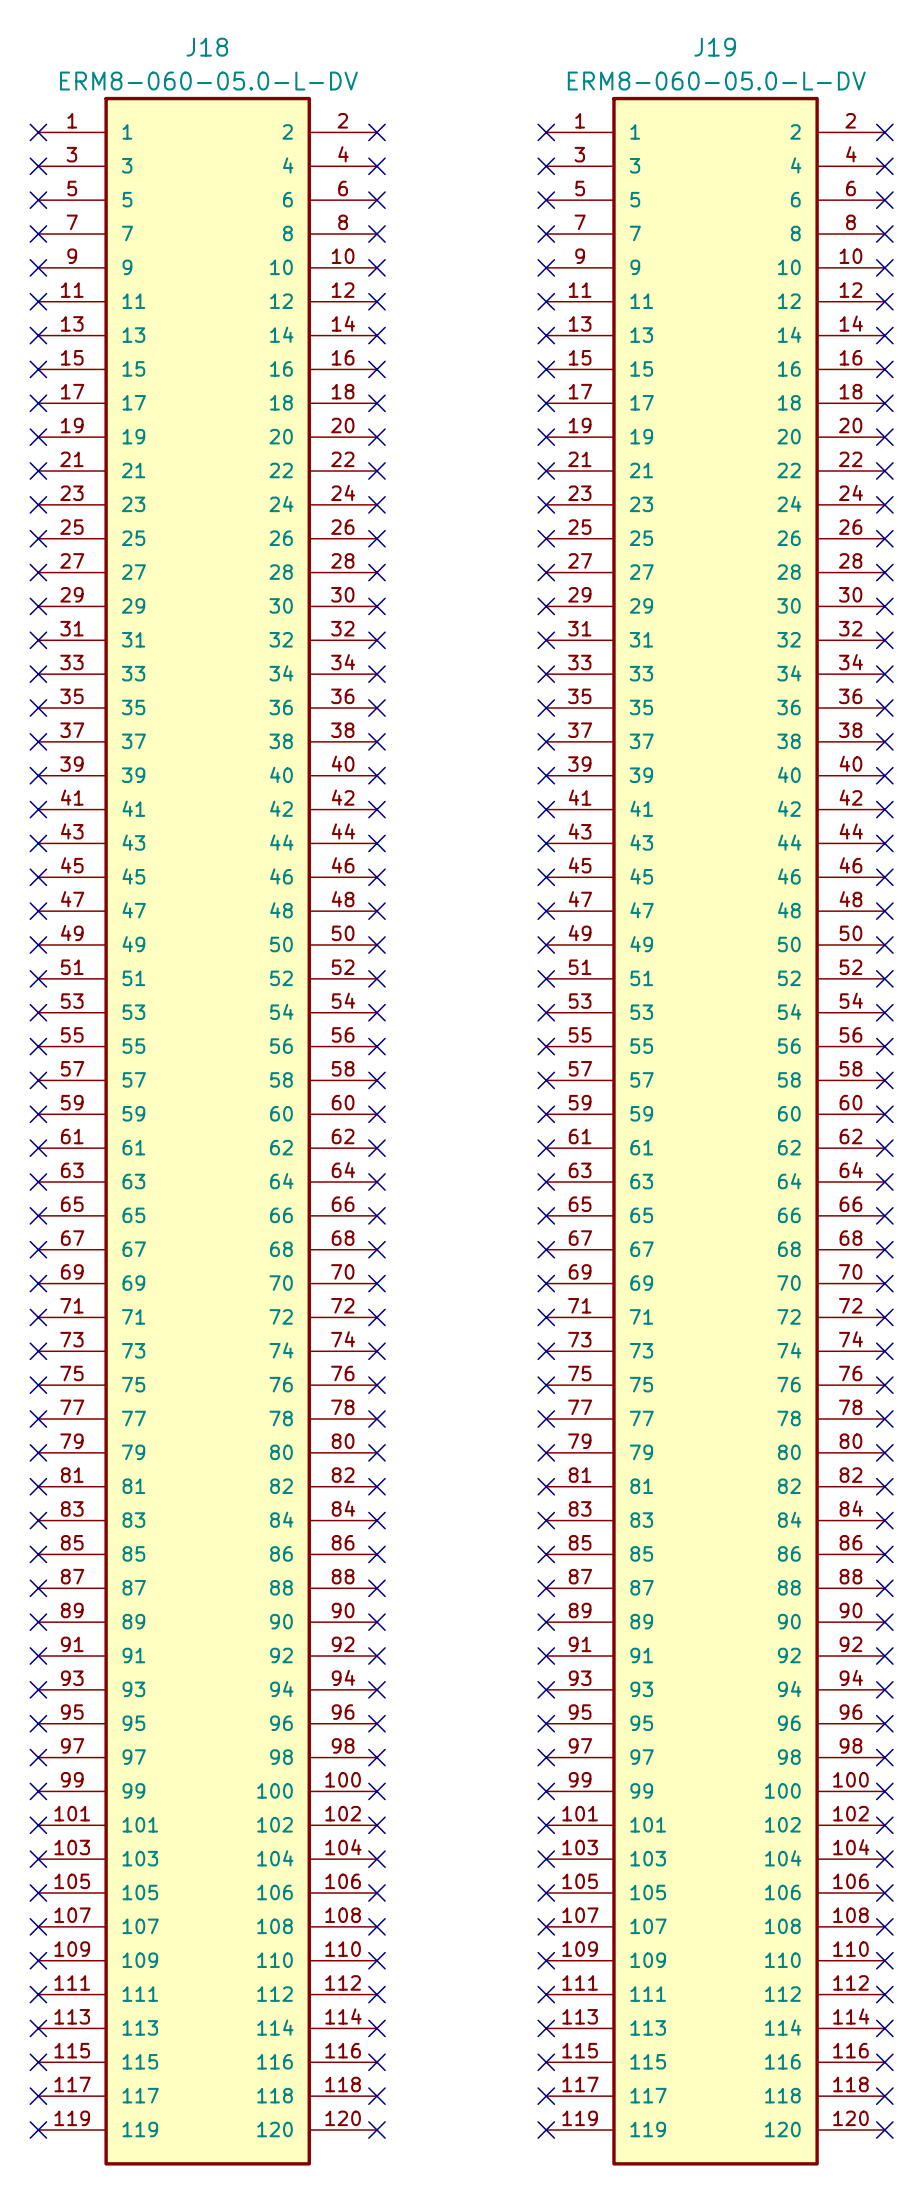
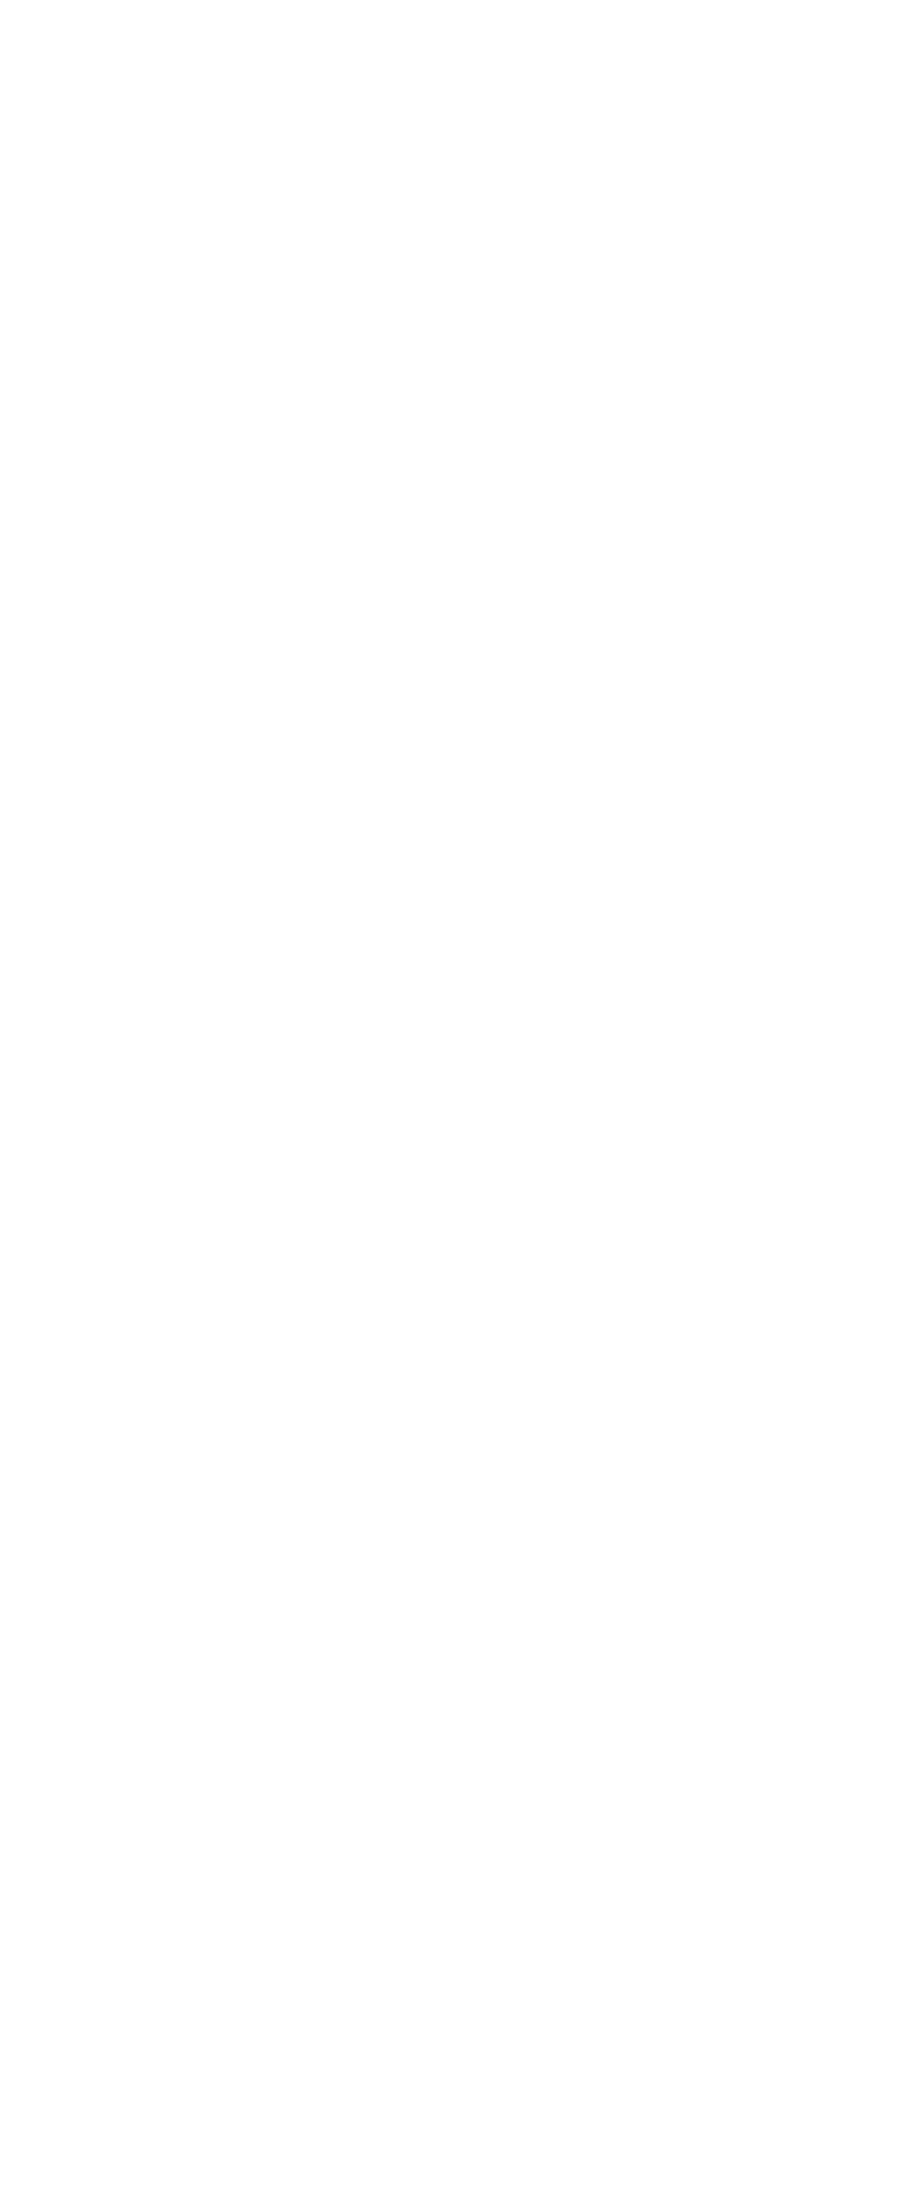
no-connect mark: (38, 132) -> none
no-connect mark: (376, 132) -> none
no-connect mark: (546, 132) -> none
no-connect mark: (884, 132) -> none
no-connect mark: (38, 166) -> none
no-connect mark: (376, 166) -> none
no-connect mark: (546, 166) -> none
no-connect mark: (884, 166) -> none
no-connect mark: (38, 200) -> none
no-connect mark: (376, 200) -> none
no-connect mark: (546, 200) -> none
no-connect mark: (884, 200) -> none
no-connect mark: (38, 234) -> none
no-connect mark: (376, 234) -> none
no-connect mark: (546, 234) -> none
no-connect mark: (884, 234) -> none
no-connect mark: (38, 267) -> none
no-connect mark: (376, 267) -> none
no-connect mark: (546, 267) -> none
no-connect mark: (884, 267) -> none
no-connect mark: (38, 301) -> none
no-connect mark: (376, 301) -> none
no-connect mark: (546, 301) -> none
no-connect mark: (884, 301) -> none
no-connect mark: (38, 335) -> none
no-connect mark: (376, 335) -> none
no-connect mark: (546, 335) -> none
no-connect mark: (884, 335) -> none
no-connect mark: (38, 369) -> none
no-connect mark: (376, 369) -> none
no-connect mark: (546, 369) -> none
no-connect mark: (884, 369) -> none
no-connect mark: (38, 403) -> none
no-connect mark: (376, 403) -> none
no-connect mark: (546, 403) -> none
no-connect mark: (884, 403) -> none
no-connect mark: (38, 437) -> none
no-connect mark: (376, 437) -> none
no-connect mark: (546, 437) -> none
no-connect mark: (884, 437) -> none
no-connect mark: (38, 471) -> none
no-connect mark: (376, 471) -> none
no-connect mark: (546, 471) -> none
no-connect mark: (884, 471) -> none
no-connect mark: (38, 504) -> none
no-connect mark: (376, 504) -> none
no-connect mark: (546, 504) -> none
no-connect mark: (884, 504) -> none
no-connect mark: (38, 538) -> none
no-connect mark: (376, 538) -> none
no-connect mark: (546, 538) -> none
no-connect mark: (884, 538) -> none
no-connect mark: (38, 572) -> none
no-connect mark: (376, 572) -> none
no-connect mark: (546, 572) -> none
no-connect mark: (884, 572) -> none
no-connect mark: (38, 606) -> none
no-connect mark: (376, 606) -> none
no-connect mark: (546, 606) -> none
no-connect mark: (884, 606) -> none
no-connect mark: (38, 640) -> none
no-connect mark: (376, 640) -> none
no-connect mark: (546, 640) -> none
no-connect mark: (884, 640) -> none
no-connect mark: (38, 674) -> none
no-connect mark: (376, 674) -> none
no-connect mark: (546, 674) -> none
no-connect mark: (884, 674) -> none
no-connect mark: (38, 708) -> none
no-connect mark: (376, 708) -> none
no-connect mark: (546, 708) -> none
no-connect mark: (884, 708) -> none
no-connect mark: (38, 741) -> none
no-connect mark: (376, 741) -> none
no-connect mark: (546, 741) -> none
no-connect mark: (884, 741) -> none
no-connect mark: (38, 775) -> none
no-connect mark: (376, 775) -> none
no-connect mark: (546, 775) -> none
no-connect mark: (884, 775) -> none
no-connect mark: (38, 809) -> none
no-connect mark: (376, 809) -> none
no-connect mark: (546, 809) -> none
no-connect mark: (884, 809) -> none
no-connect mark: (38, 843) -> none
no-connect mark: (376, 843) -> none
no-connect mark: (546, 843) -> none
no-connect mark: (884, 843) -> none
no-connect mark: (38, 877) -> none
no-connect mark: (376, 877) -> none
no-connect mark: (546, 877) -> none
no-connect mark: (884, 877) -> none
no-connect mark: (38, 911) -> none
no-connect mark: (376, 911) -> none
no-connect mark: (546, 911) -> none
no-connect mark: (884, 911) -> none
no-connect mark: (38, 945) -> none
no-connect mark: (376, 945) -> none
no-connect mark: (546, 945) -> none
no-connect mark: (884, 945) -> none
no-connect mark: (38, 978) -> none
no-connect mark: (376, 978) -> none
no-connect mark: (546, 978) -> none
no-connect mark: (884, 978) -> none
no-connect mark: (38, 1012) -> none
no-connect mark: (376, 1012) -> none
no-connect mark: (546, 1012) -> none
no-connect mark: (884, 1012) -> none
no-connect mark: (38, 1046) -> none
no-connect mark: (376, 1046) -> none
no-connect mark: (546, 1046) -> none
no-connect mark: (884, 1046) -> none
no-connect mark: (38, 1080) -> none
no-connect mark: (376, 1080) -> none
no-connect mark: (546, 1080) -> none
no-connect mark: (884, 1080) -> none
no-connect mark: (38, 1114) -> none
no-connect mark: (376, 1114) -> none
no-connect mark: (546, 1114) -> none
no-connect mark: (884, 1114) -> none
J18: ERM8-060-05.0-L-DV (207, 1131) -> none
J19: ERM8-060-05.0-L-DV (715, 1131) -> none
no-connect mark: (38, 1148) -> none
no-connect mark: (376, 1148) -> none
no-connect mark: (546, 1148) -> none
no-connect mark: (884, 1148) -> none
no-connect mark: (38, 1182) -> none
no-connect mark: (376, 1182) -> none
no-connect mark: (546, 1182) -> none
no-connect mark: (884, 1182) -> none
no-connect mark: (38, 1215) -> none
no-connect mark: (376, 1215) -> none
no-connect mark: (546, 1215) -> none
no-connect mark: (884, 1215) -> none
no-connect mark: (38, 1249) -> none
no-connect mark: (376, 1249) -> none
no-connect mark: (546, 1249) -> none
no-connect mark: (884, 1249) -> none
no-connect mark: (38, 1283) -> none
no-connect mark: (376, 1283) -> none
no-connect mark: (546, 1283) -> none
no-connect mark: (884, 1283) -> none
no-connect mark: (38, 1317) -> none
no-connect mark: (376, 1317) -> none
no-connect mark: (546, 1317) -> none
no-connect mark: (884, 1317) -> none
no-connect mark: (38, 1351) -> none
no-connect mark: (376, 1351) -> none
no-connect mark: (546, 1351) -> none
no-connect mark: (884, 1351) -> none
no-connect mark: (38, 1385) -> none
no-connect mark: (376, 1385) -> none
no-connect mark: (546, 1385) -> none
no-connect mark: (884, 1385) -> none
no-connect mark: (38, 1419) -> none
no-connect mark: (376, 1419) -> none
no-connect mark: (546, 1419) -> none
no-connect mark: (884, 1419) -> none
no-connect mark: (38, 1452) -> none
no-connect mark: (376, 1452) -> none
no-connect mark: (546, 1452) -> none
no-connect mark: (884, 1452) -> none
no-connect mark: (38, 1486) -> none
no-connect mark: (376, 1486) -> none
no-connect mark: (546, 1486) -> none
no-connect mark: (884, 1486) -> none
no-connect mark: (38, 1520) -> none
no-connect mark: (376, 1520) -> none
no-connect mark: (546, 1520) -> none
no-connect mark: (884, 1520) -> none
no-connect mark: (38, 1554) -> none
no-connect mark: (376, 1554) -> none
no-connect mark: (546, 1554) -> none
no-connect mark: (884, 1554) -> none
no-connect mark: (38, 1588) -> none
no-connect mark: (376, 1588) -> none
no-connect mark: (546, 1588) -> none
no-connect mark: (884, 1588) -> none
no-connect mark: (38, 1622) -> none
no-connect mark: (376, 1622) -> none
no-connect mark: (546, 1622) -> none
no-connect mark: (884, 1622) -> none
no-connect mark: (38, 1656) -> none
no-connect mark: (376, 1656) -> none
no-connect mark: (546, 1656) -> none
no-connect mark: (884, 1656) -> none
no-connect mark: (38, 1689) -> none
no-connect mark: (376, 1689) -> none
no-connect mark: (546, 1689) -> none
no-connect mark: (884, 1689) -> none
no-connect mark: (38, 1723) -> none
no-connect mark: (376, 1723) -> none
no-connect mark: (546, 1723) -> none
no-connect mark: (884, 1723) -> none
no-connect mark: (38, 1757) -> none
no-connect mark: (376, 1757) -> none
no-connect mark: (546, 1757) -> none
no-connect mark: (884, 1757) -> none
no-connect mark: (38, 1791) -> none
no-connect mark: (376, 1791) -> none
no-connect mark: (546, 1791) -> none
no-connect mark: (884, 1791) -> none
no-connect mark: (38, 1825) -> none
no-connect mark: (376, 1825) -> none
no-connect mark: (546, 1825) -> none
no-connect mark: (884, 1825) -> none
no-connect mark: (38, 1859) -> none
no-connect mark: (376, 1859) -> none
no-connect mark: (546, 1859) -> none
no-connect mark: (884, 1859) -> none
no-connect mark: (38, 1893) -> none
no-connect mark: (376, 1893) -> none
no-connect mark: (546, 1893) -> none
no-connect mark: (884, 1893) -> none
no-connect mark: (38, 1926) -> none
no-connect mark: (376, 1926) -> none
no-connect mark: (546, 1926) -> none
no-connect mark: (884, 1926) -> none
no-connect mark: (38, 1960) -> none
no-connect mark: (376, 1960) -> none
no-connect mark: (546, 1960) -> none
no-connect mark: (884, 1960) -> none
no-connect mark: (38, 1994) -> none
no-connect mark: (376, 1994) -> none
no-connect mark: (546, 1994) -> none
no-connect mark: (884, 1994) -> none
no-connect mark: (38, 2028) -> none
no-connect mark: (376, 2028) -> none
no-connect mark: (546, 2028) -> none
no-connect mark: (884, 2028) -> none
no-connect mark: (38, 2062) -> none
no-connect mark: (376, 2062) -> none
no-connect mark: (546, 2062) -> none
no-connect mark: (884, 2062) -> none
no-connect mark: (38, 2096) -> none
no-connect mark: (376, 2096) -> none
no-connect mark: (546, 2096) -> none
no-connect mark: (884, 2096) -> none
no-connect mark: (38, 2130) -> none
no-connect mark: (376, 2130) -> none
no-connect mark: (546, 2130) -> none
no-connect mark: (884, 2130) -> none

